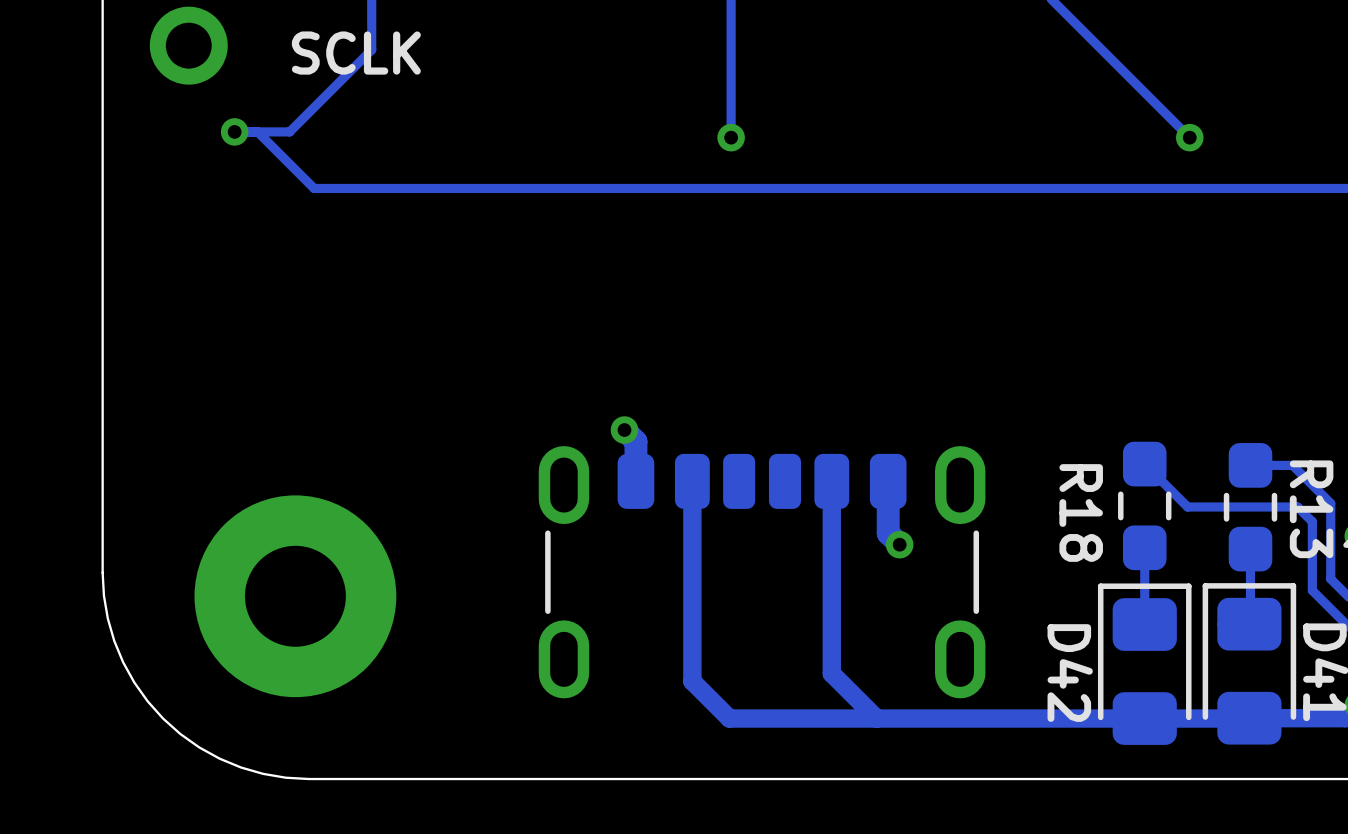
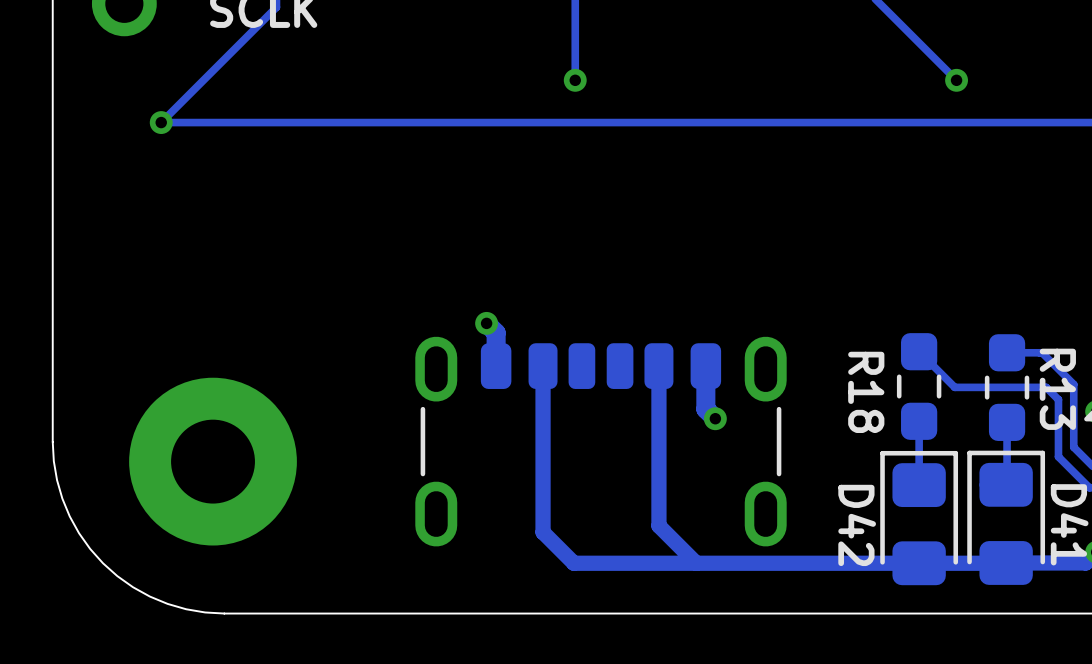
via position: (234, 131) -> (161, 122)
track: (257, 131) (314, 188) -> (208, 75) (161, 122) (228, 122)
track: (289, 131) (234, 131) -> none

